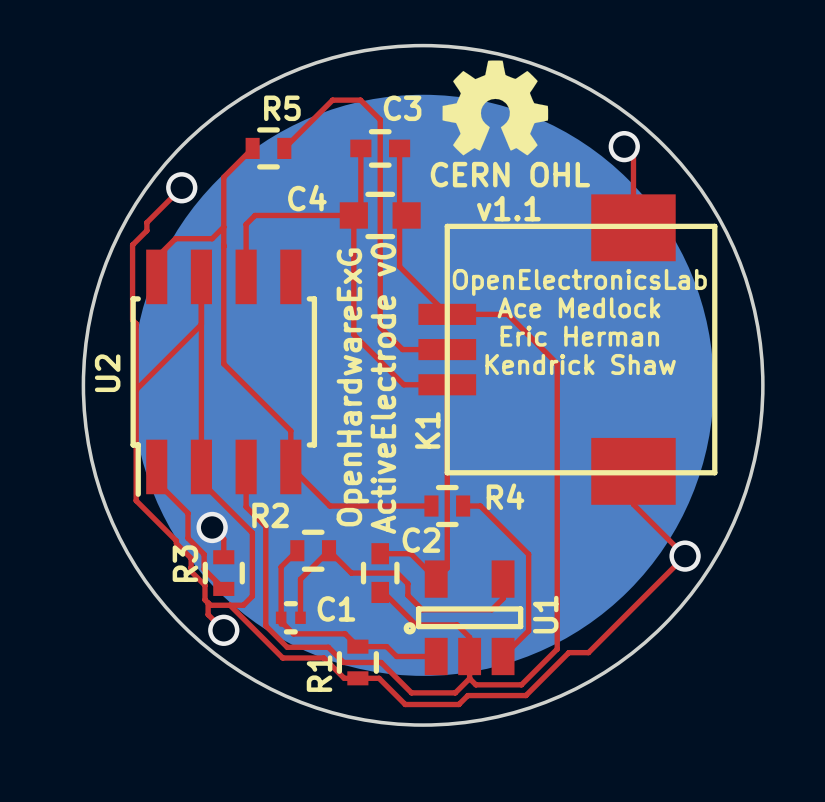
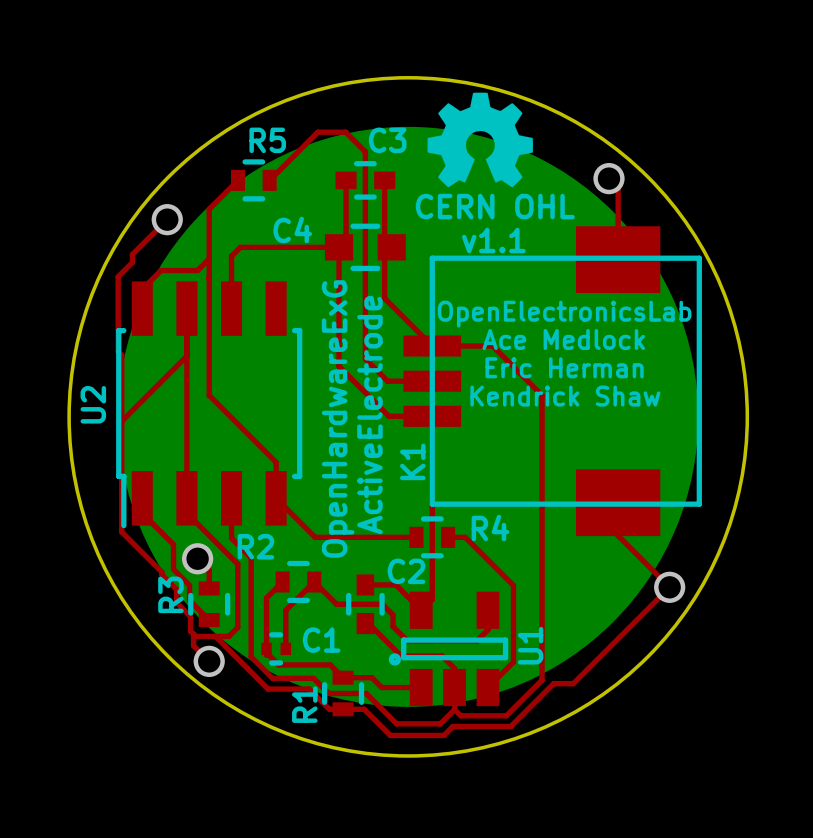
text: ActiveElectrode v0 (383, 388) -> ActiveElectrode (369, 415)

